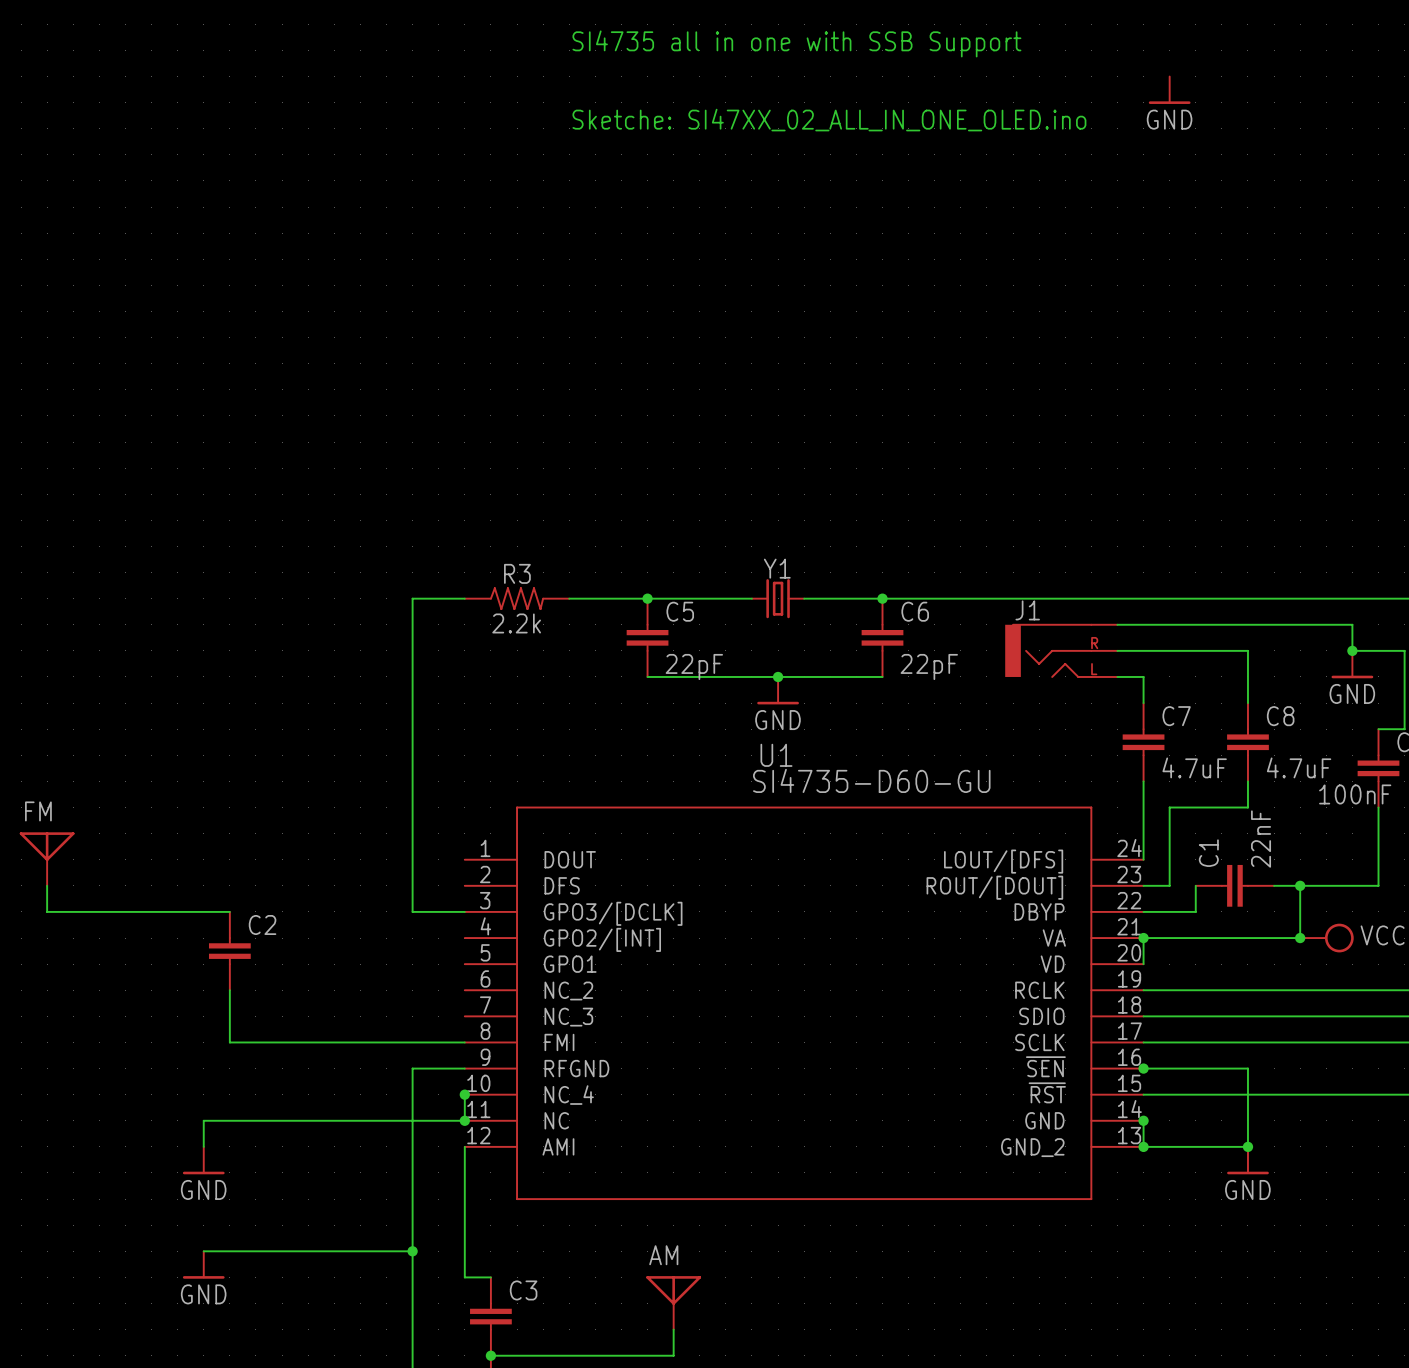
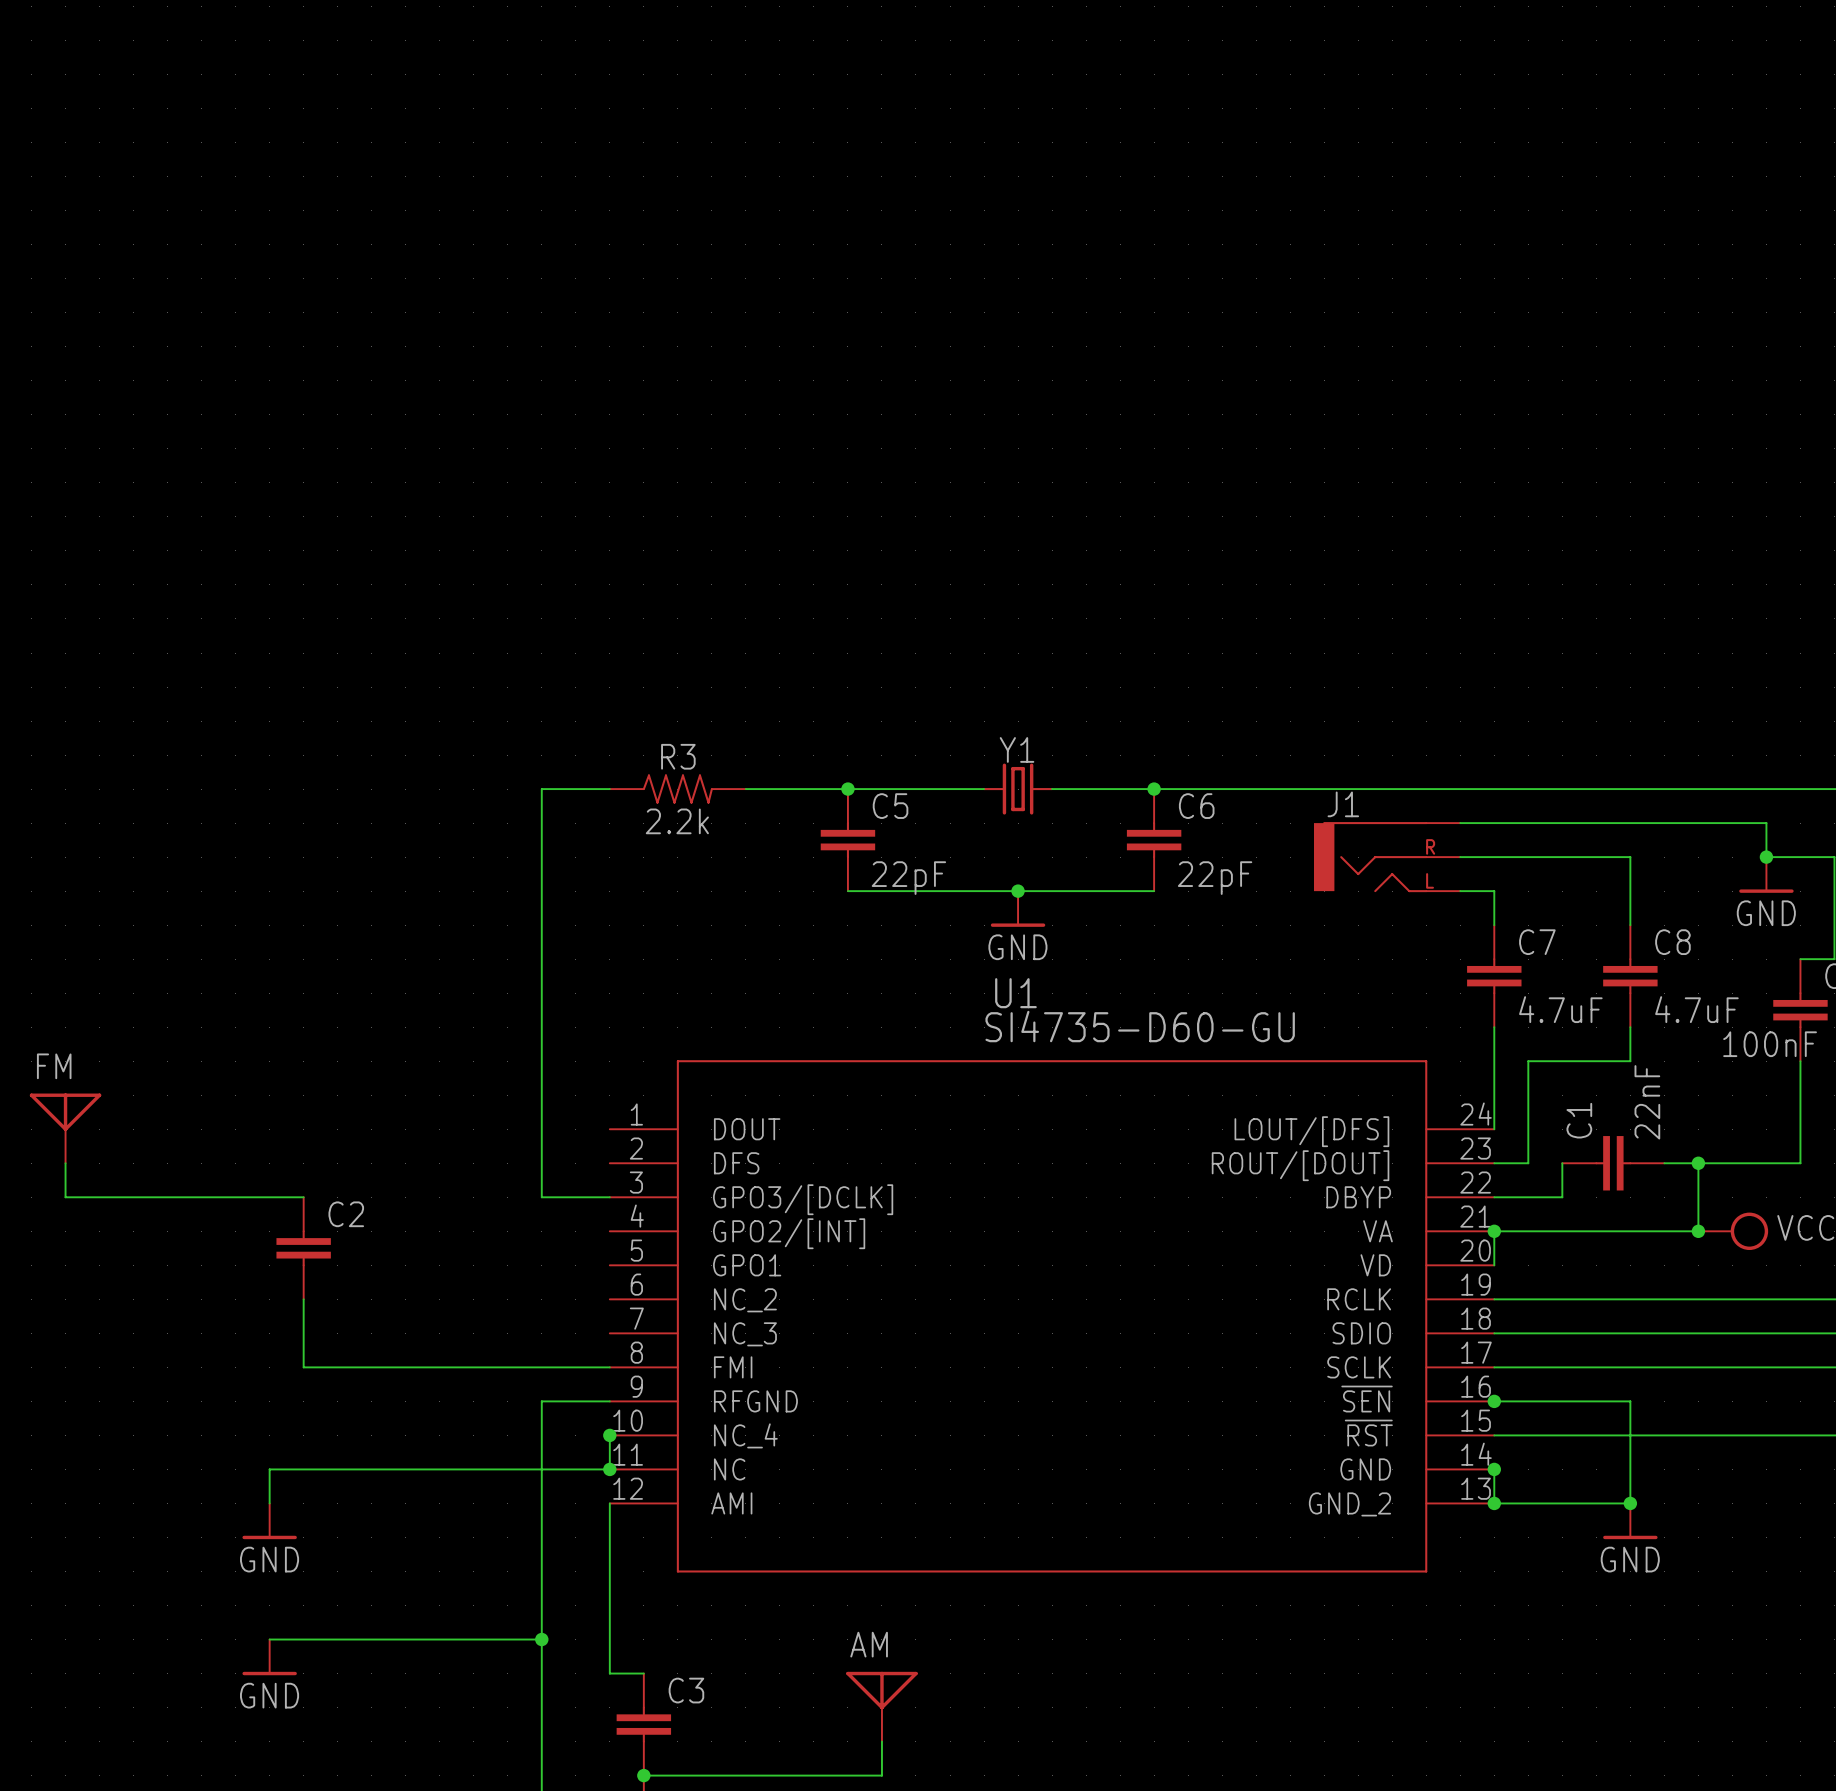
text: SI4735 all in one with SSB Support (796, 43) -> none
power symbol: GND (1169, 90) -> none
text: Sketche: SI47XX_02_ALL_IN_ONE_OLED.ino (829, 120) -> none

